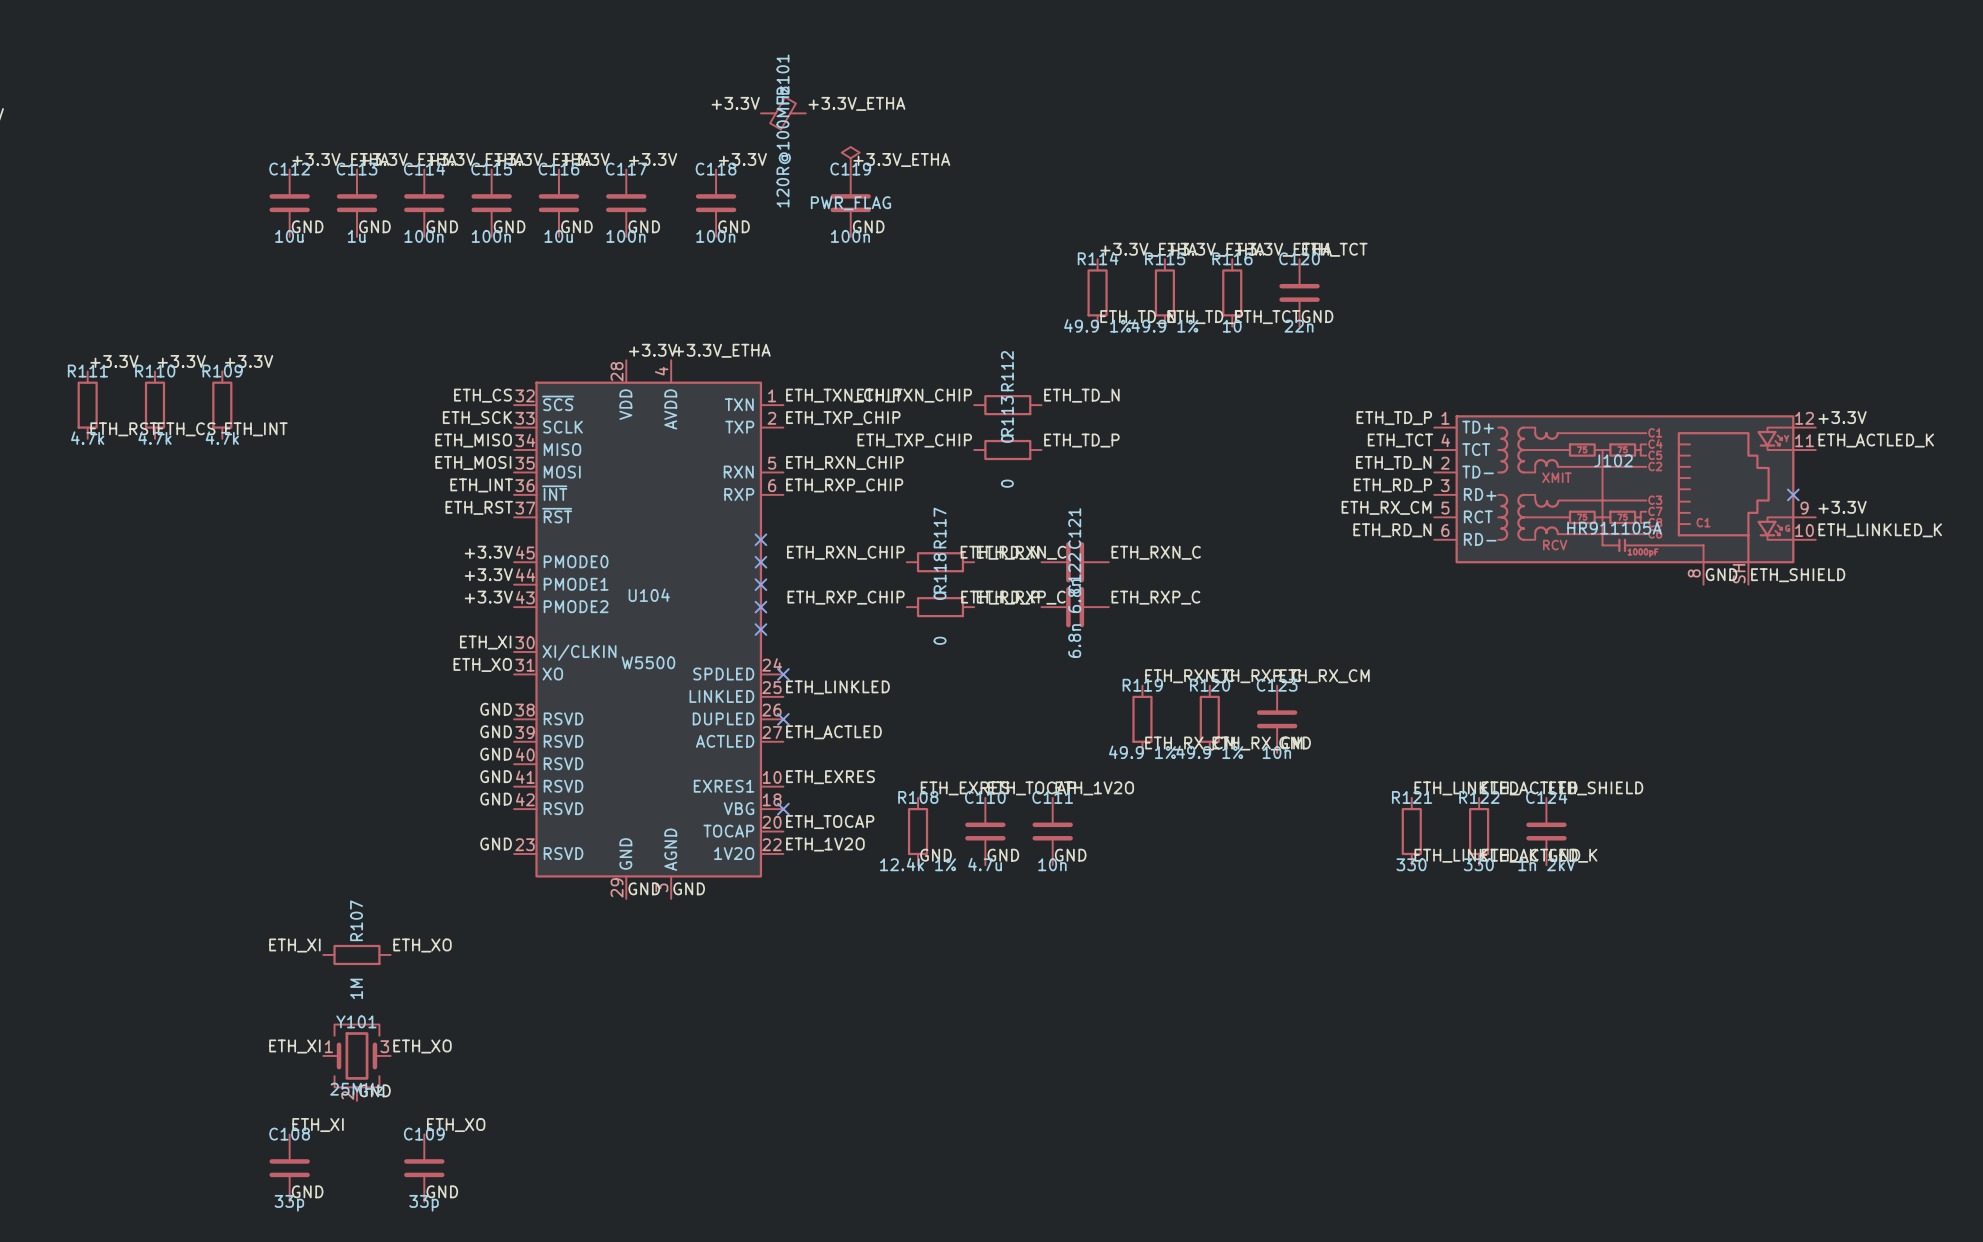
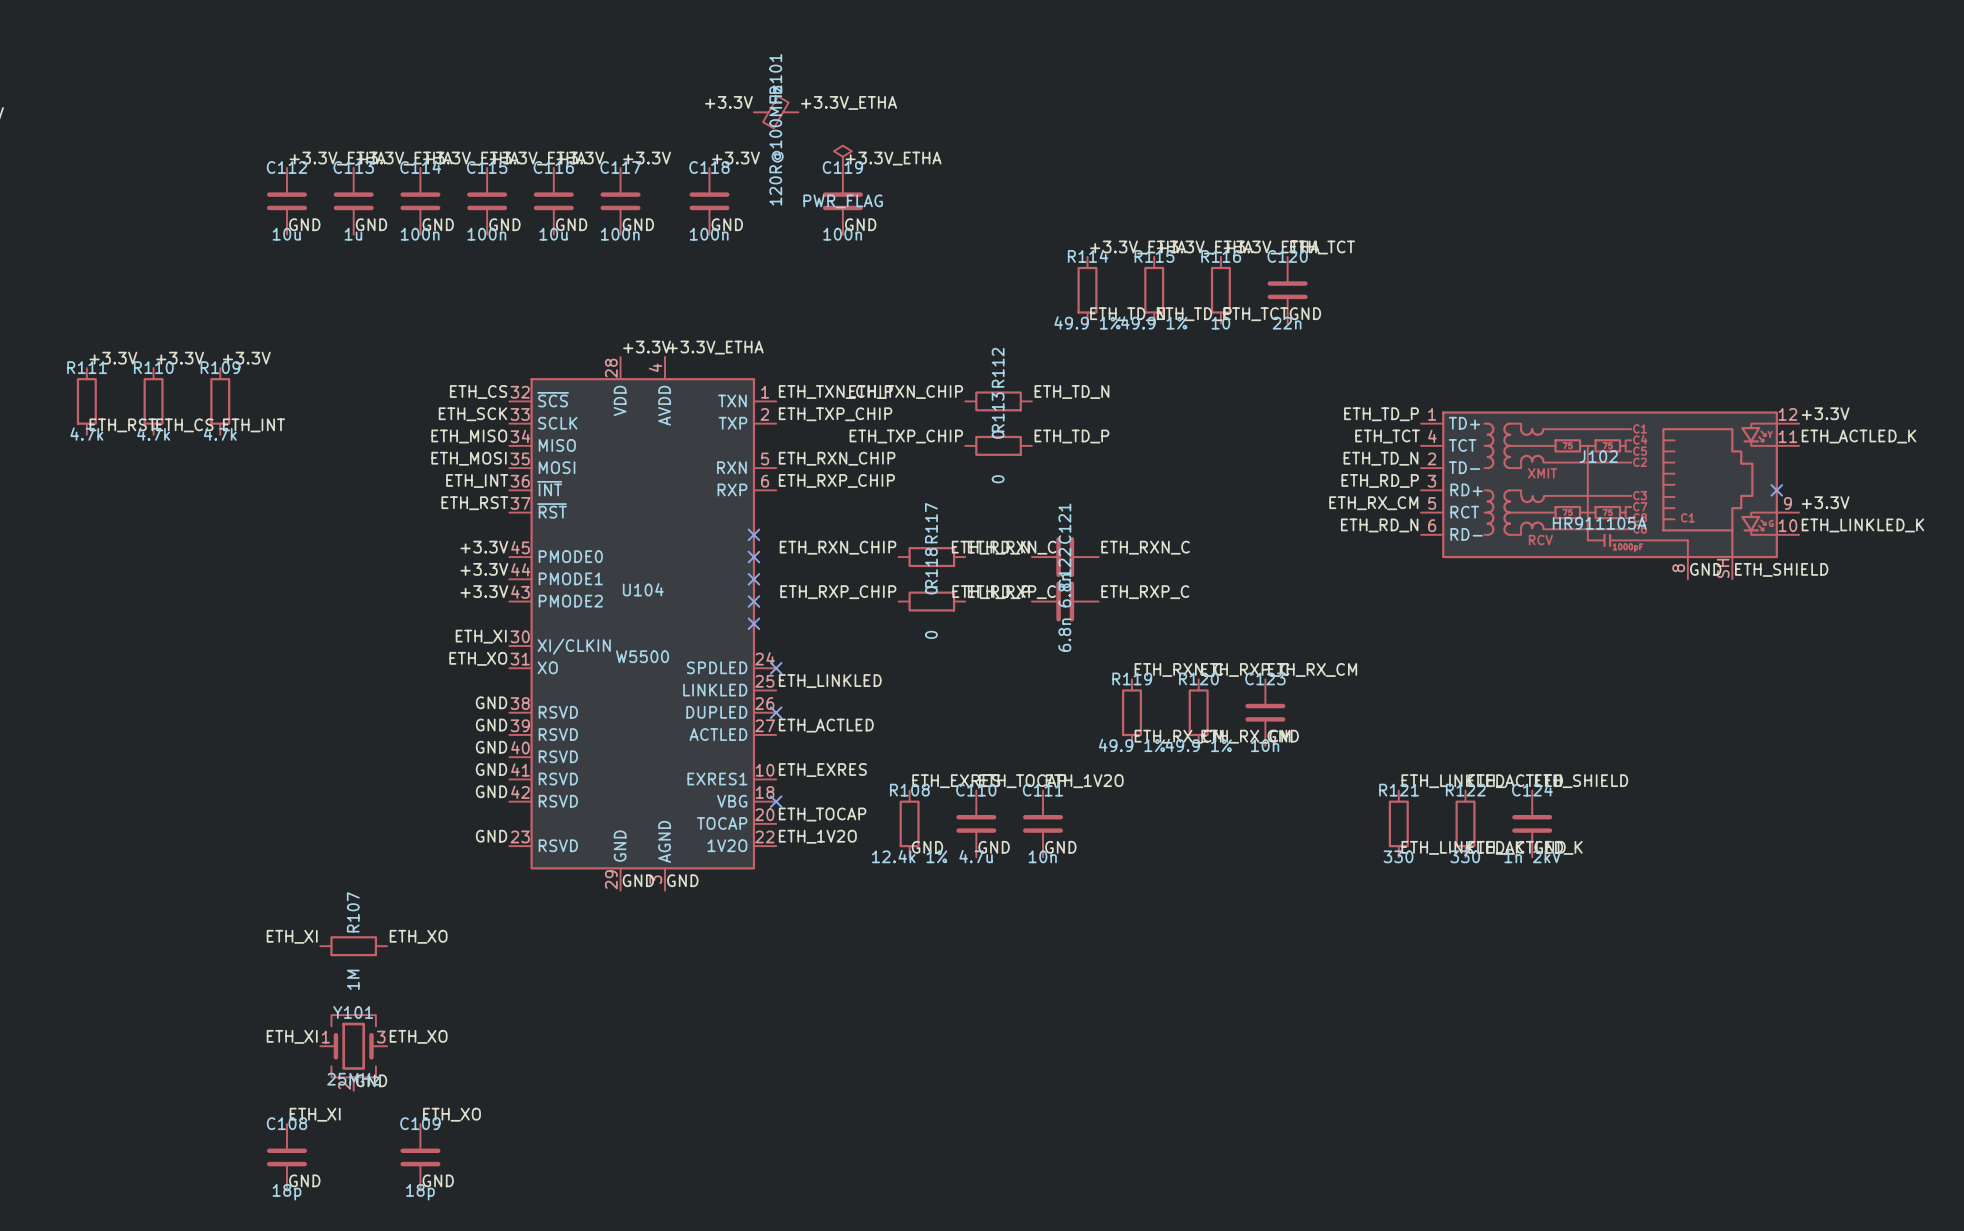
C108 value: 33p (289, 1203) -> 18p (286, 1192)
C109 value: 33p (424, 1203) -> 18p (420, 1192)

